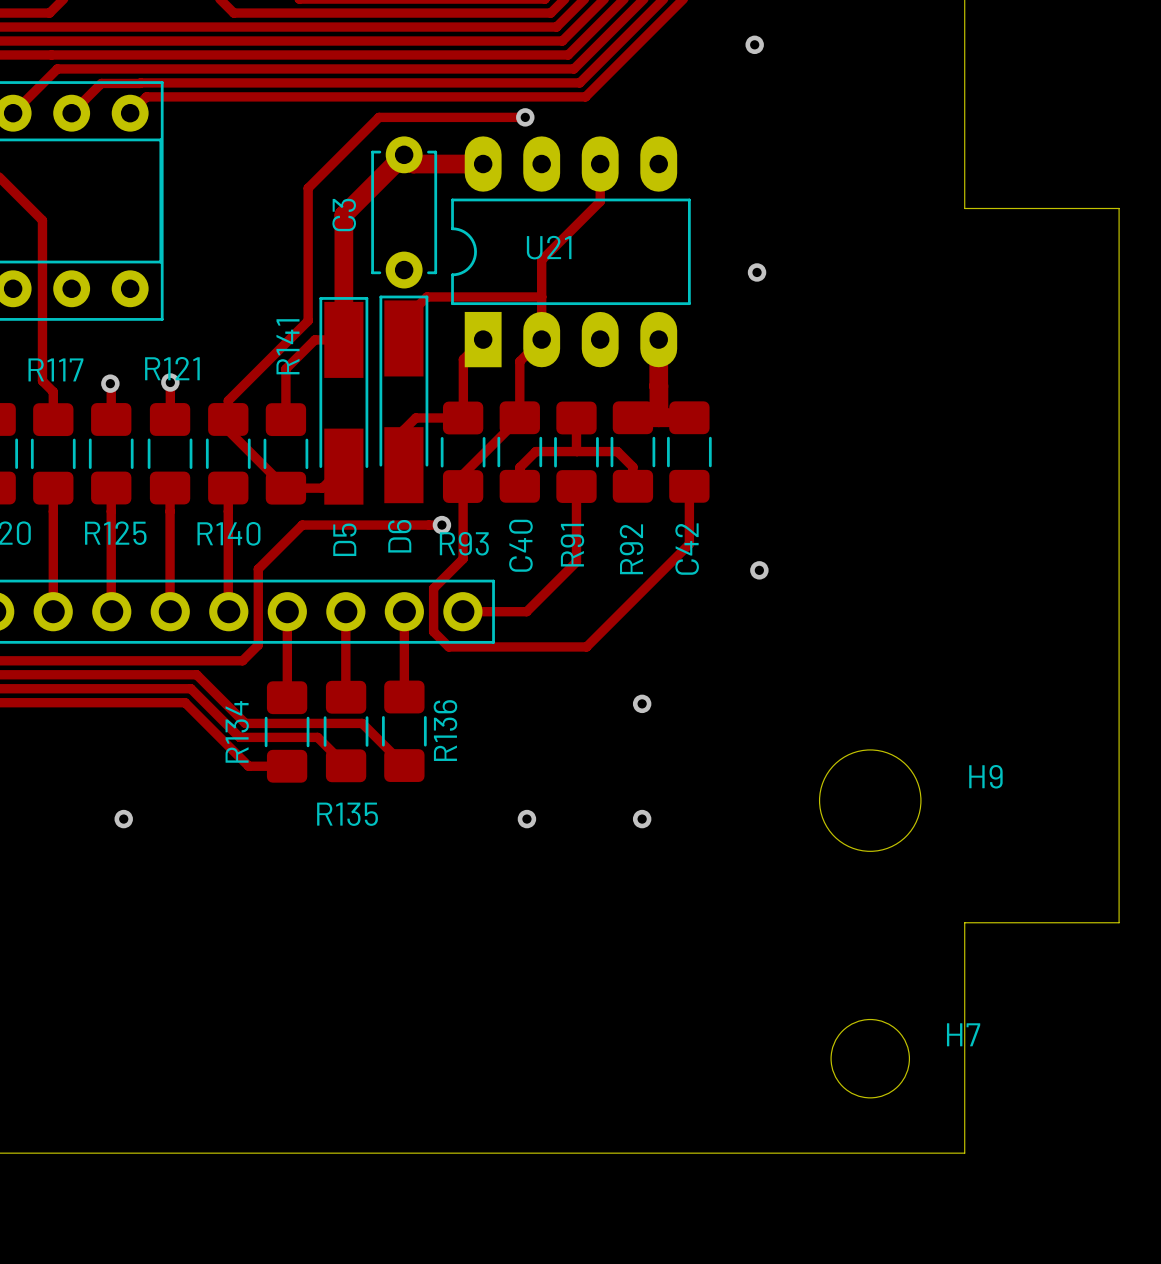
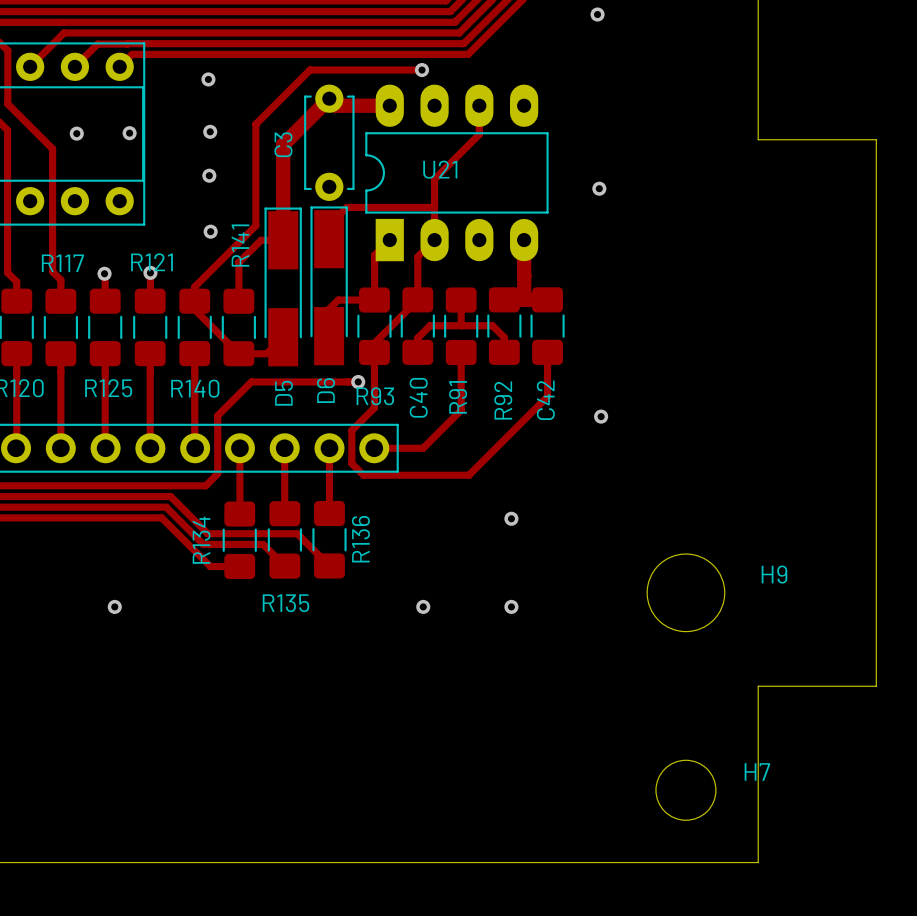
via: none -> (208, 79)
via: none -> (210, 131)
via: none -> (129, 133)
via: none -> (76, 133)
via: none -> (209, 175)
via: none -> (210, 231)

